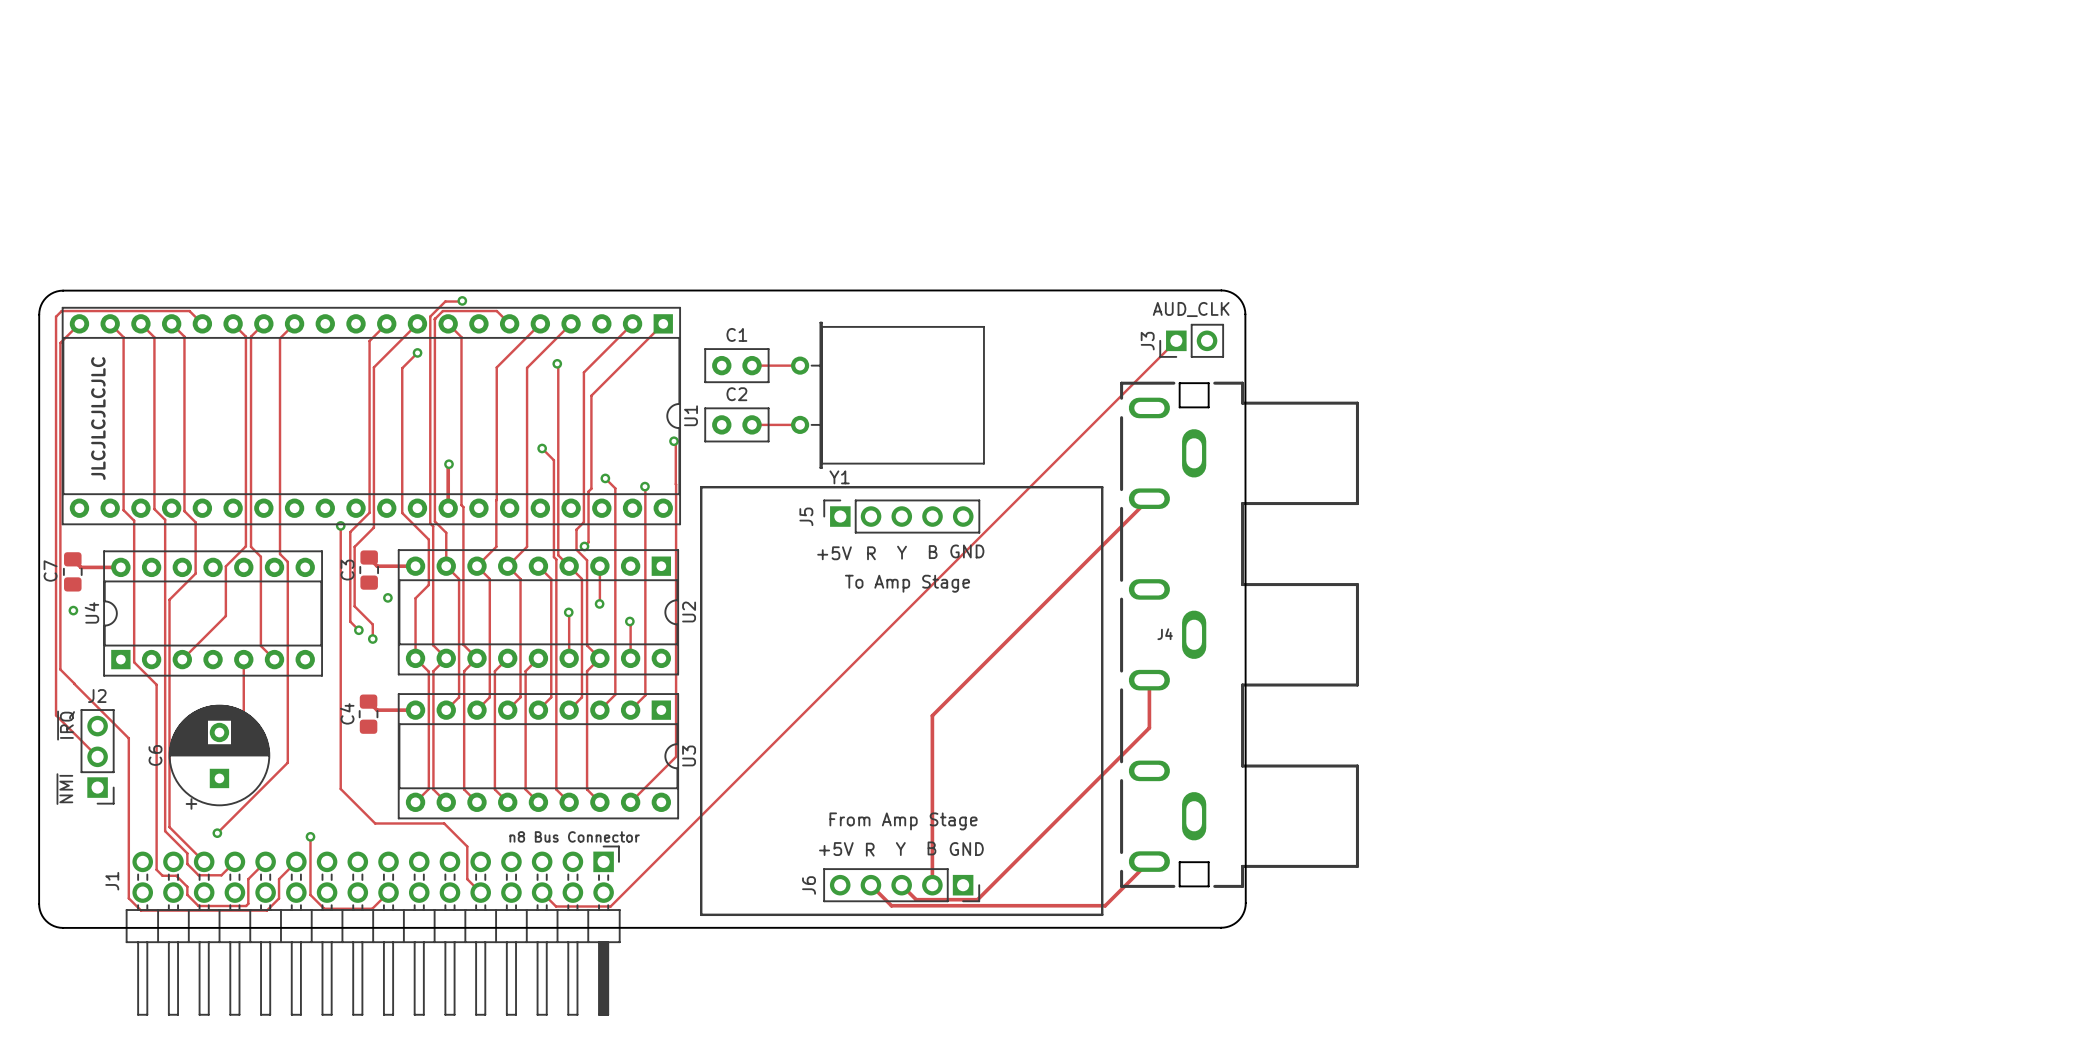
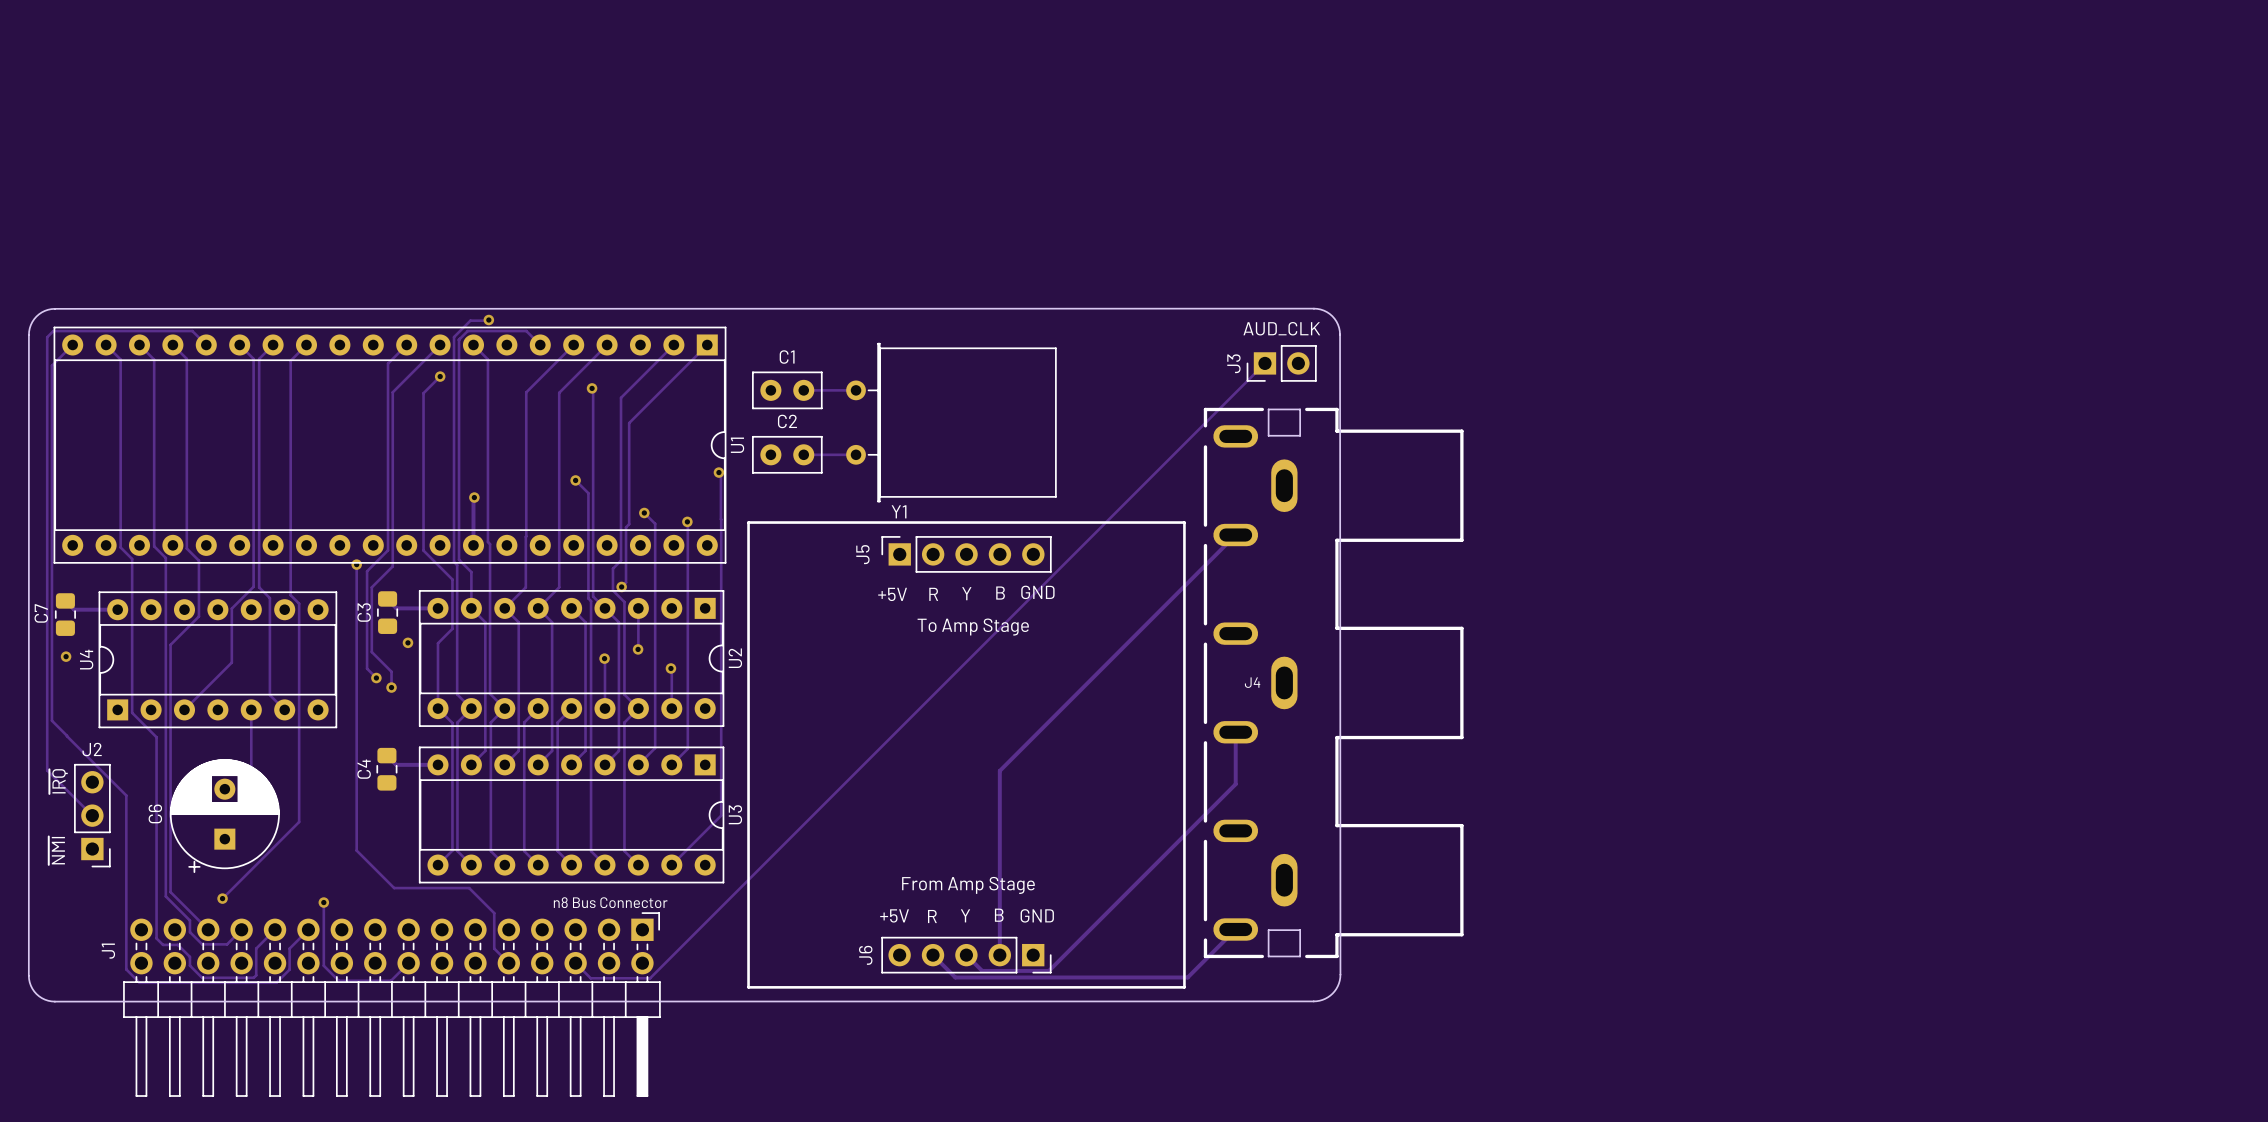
text: JLCJLCJLCJLC (98, 418) -> none

